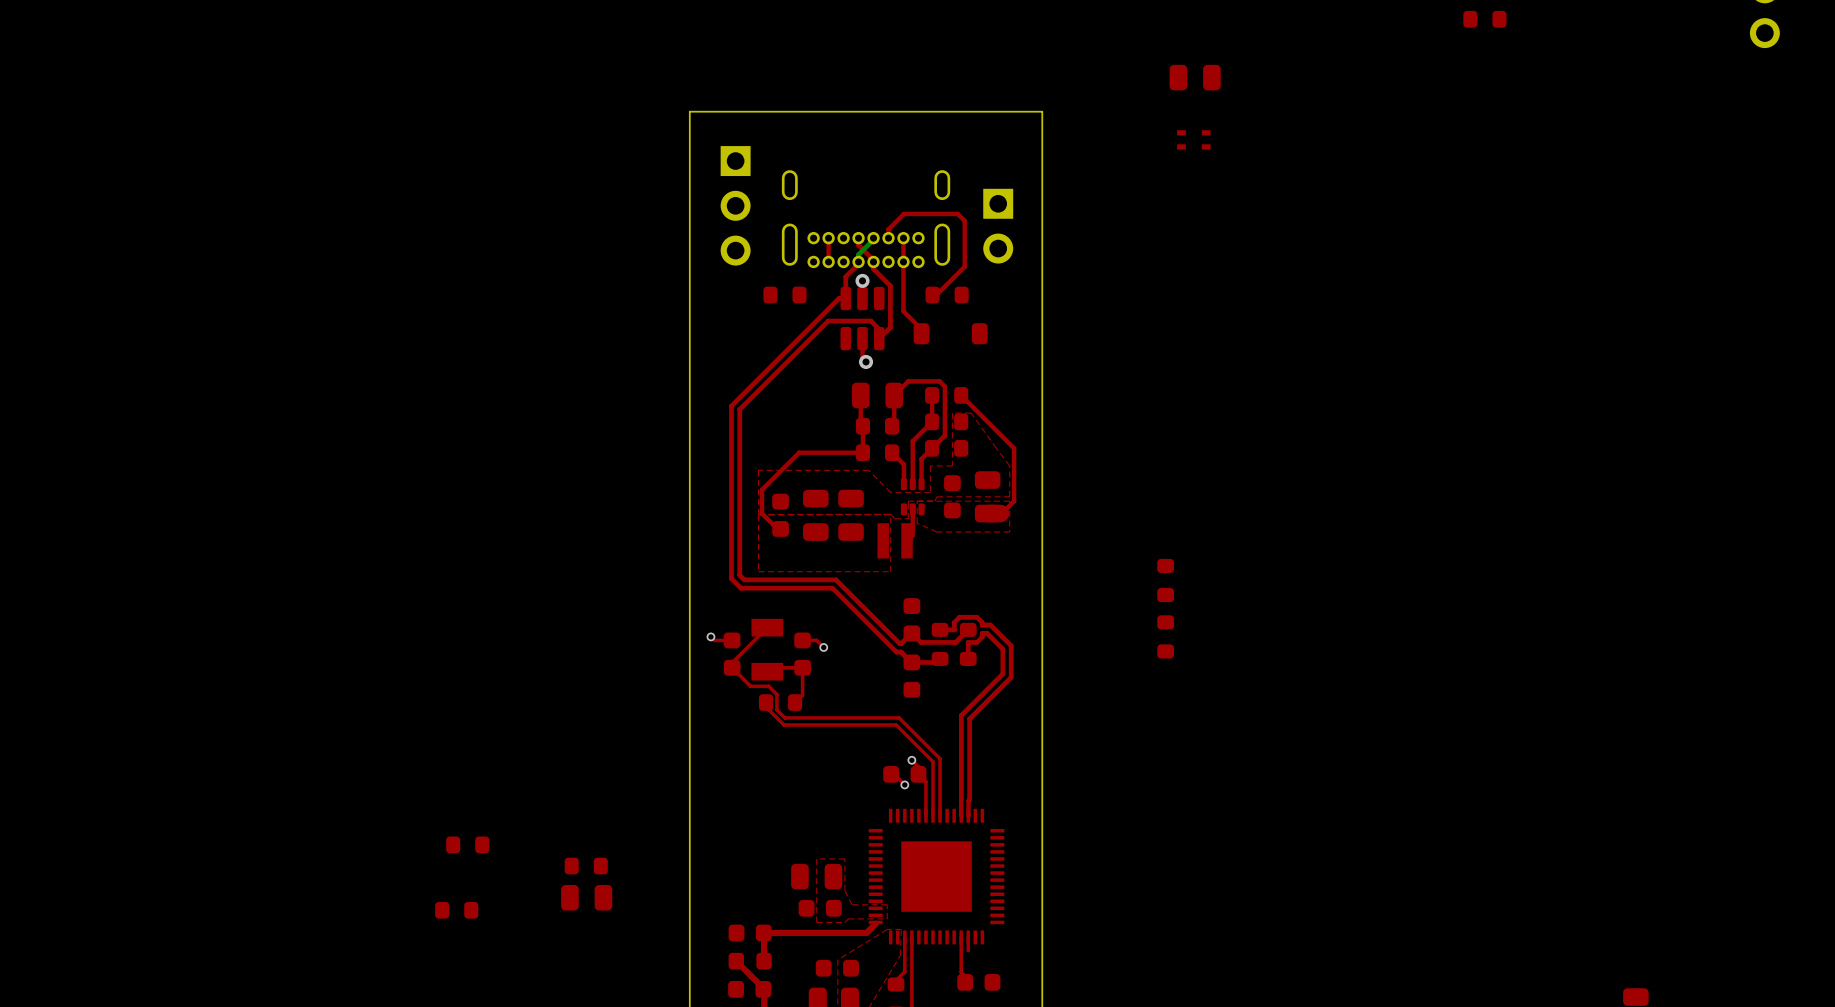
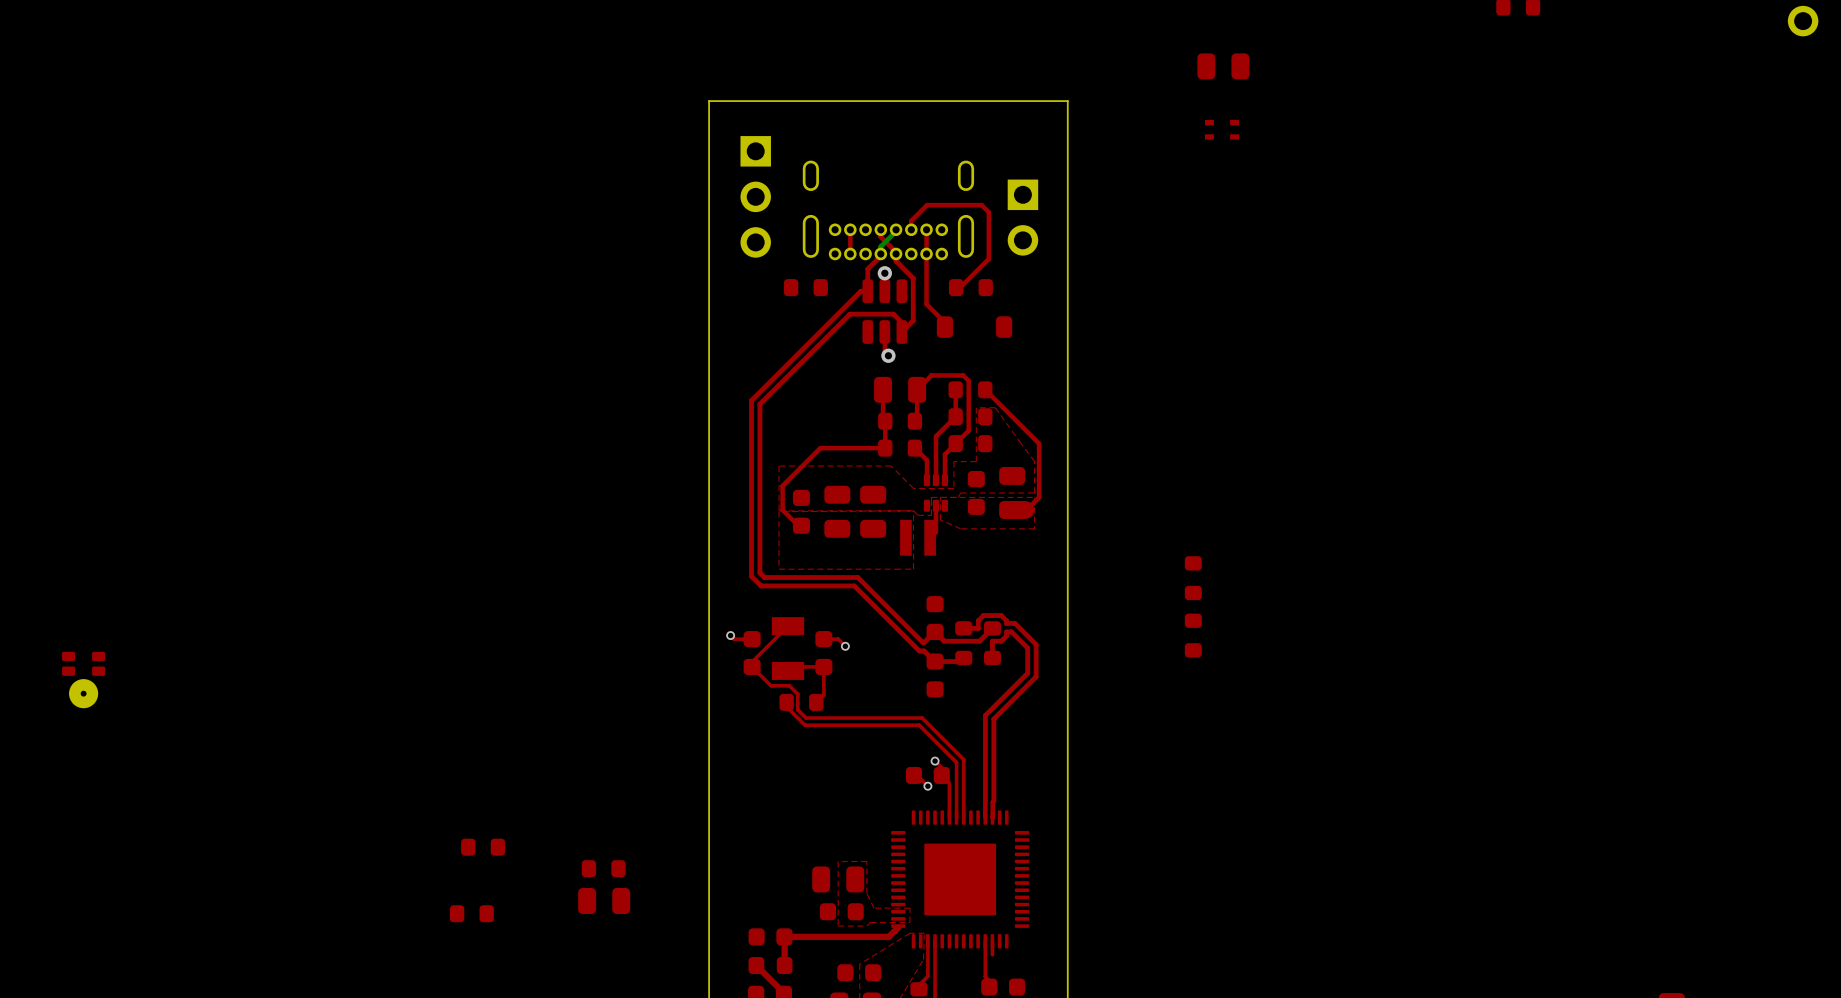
part: none -> (83, 680)

